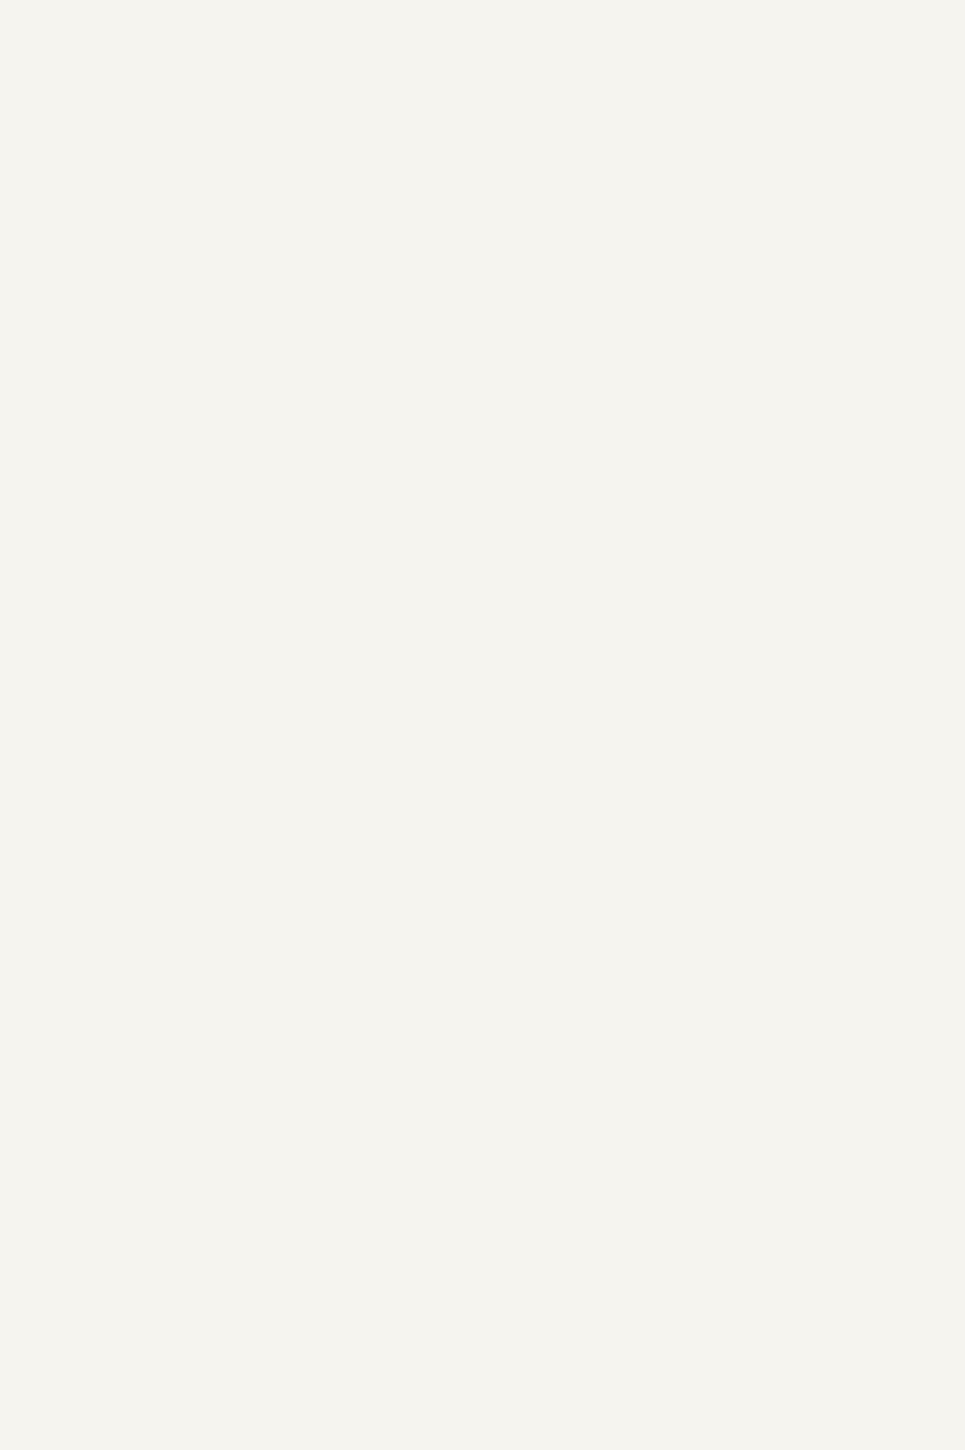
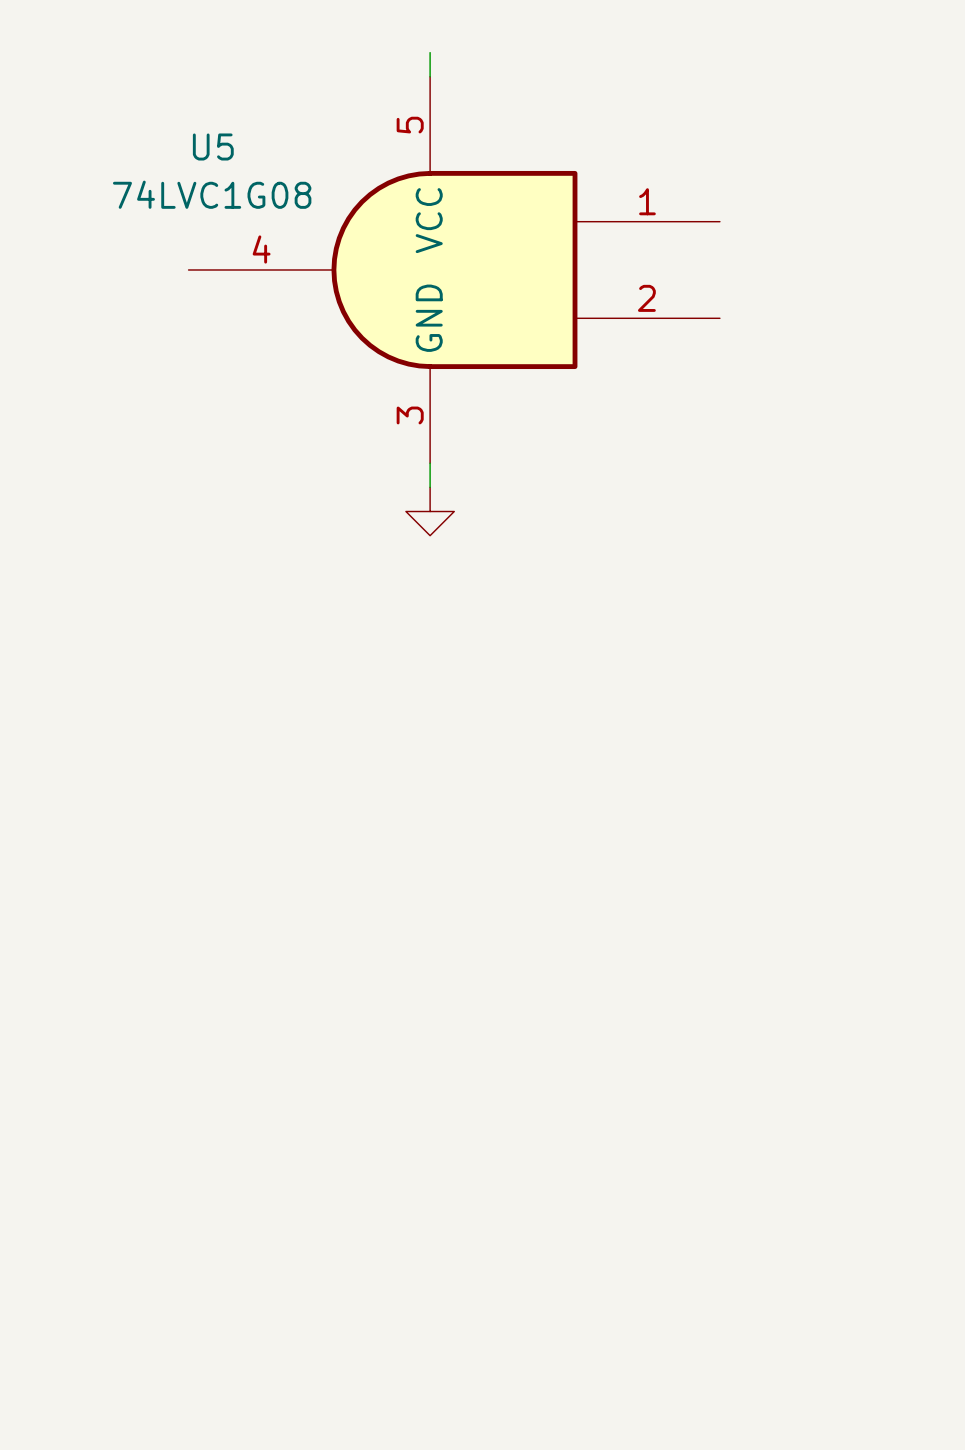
wire: none -> (430, 52) (430, 76)
U5: none -> 74LVC1G08 (454, 269)
wire: none -> (430, 463) (430, 487)
power symbol: none -> (430, 511)

